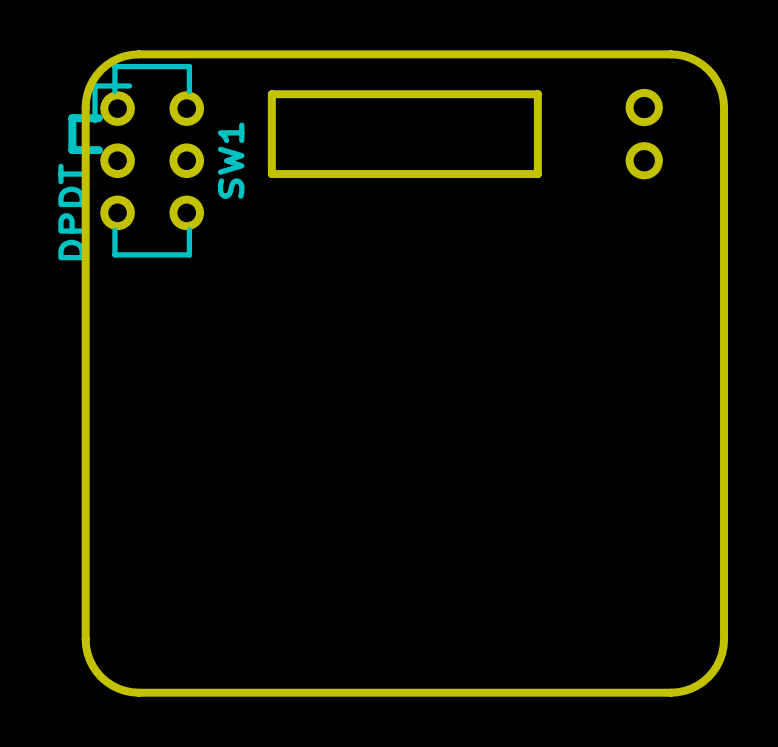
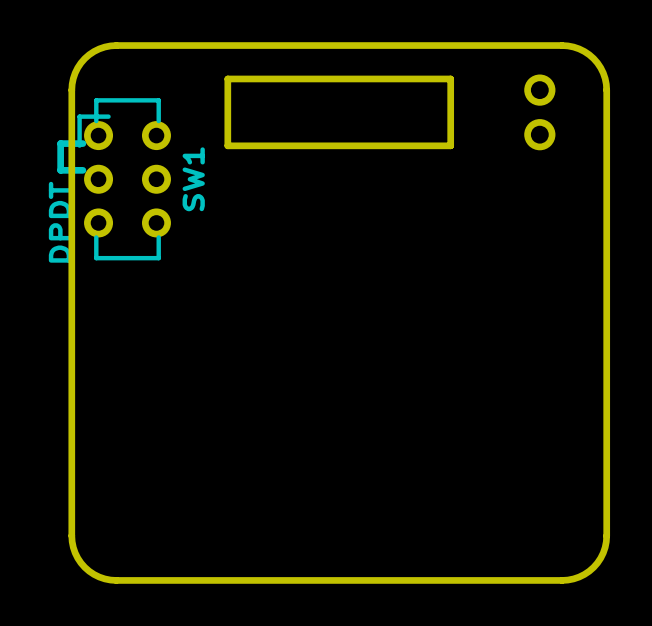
SW1 position: (136, 160) -> (114, 179)

